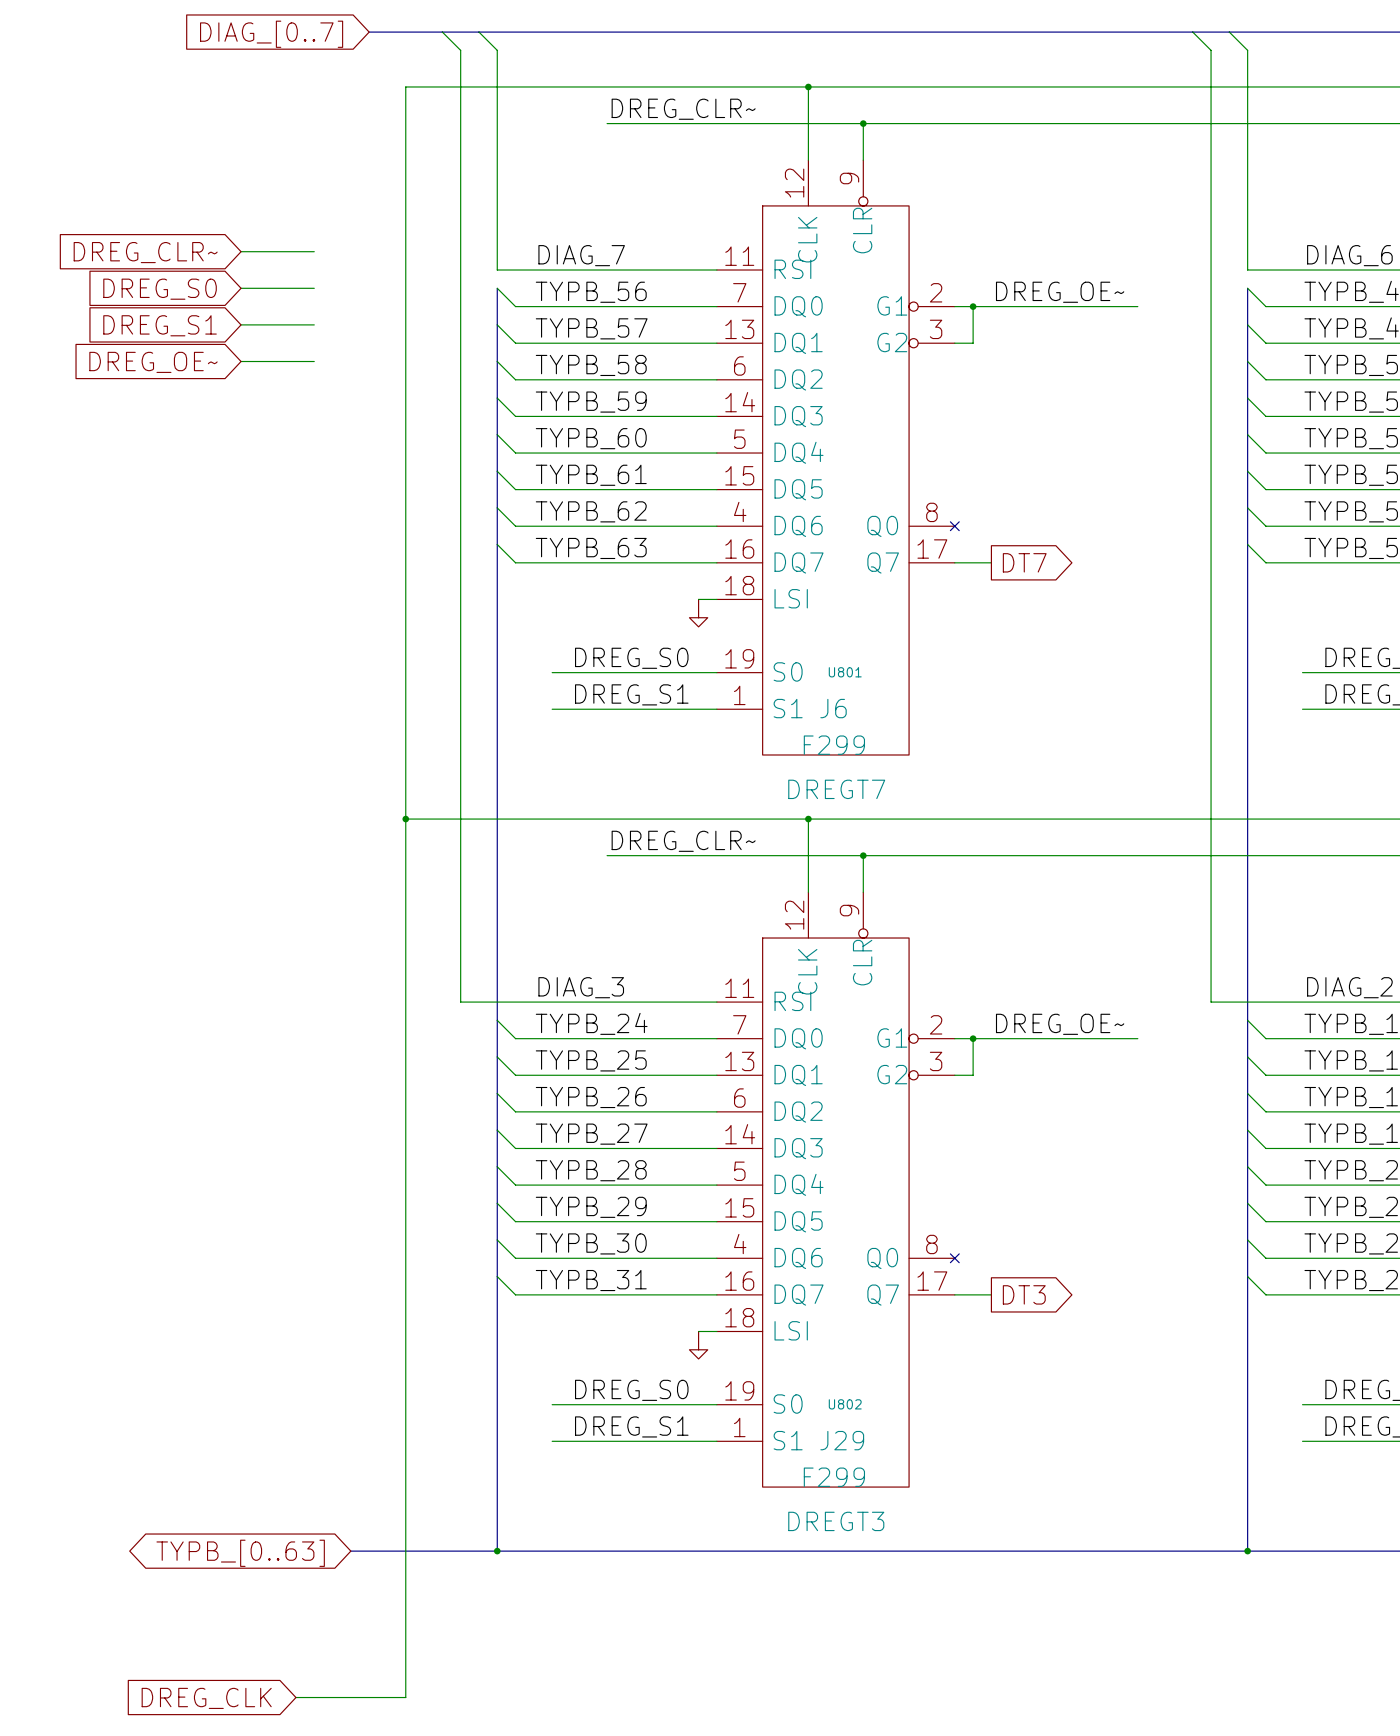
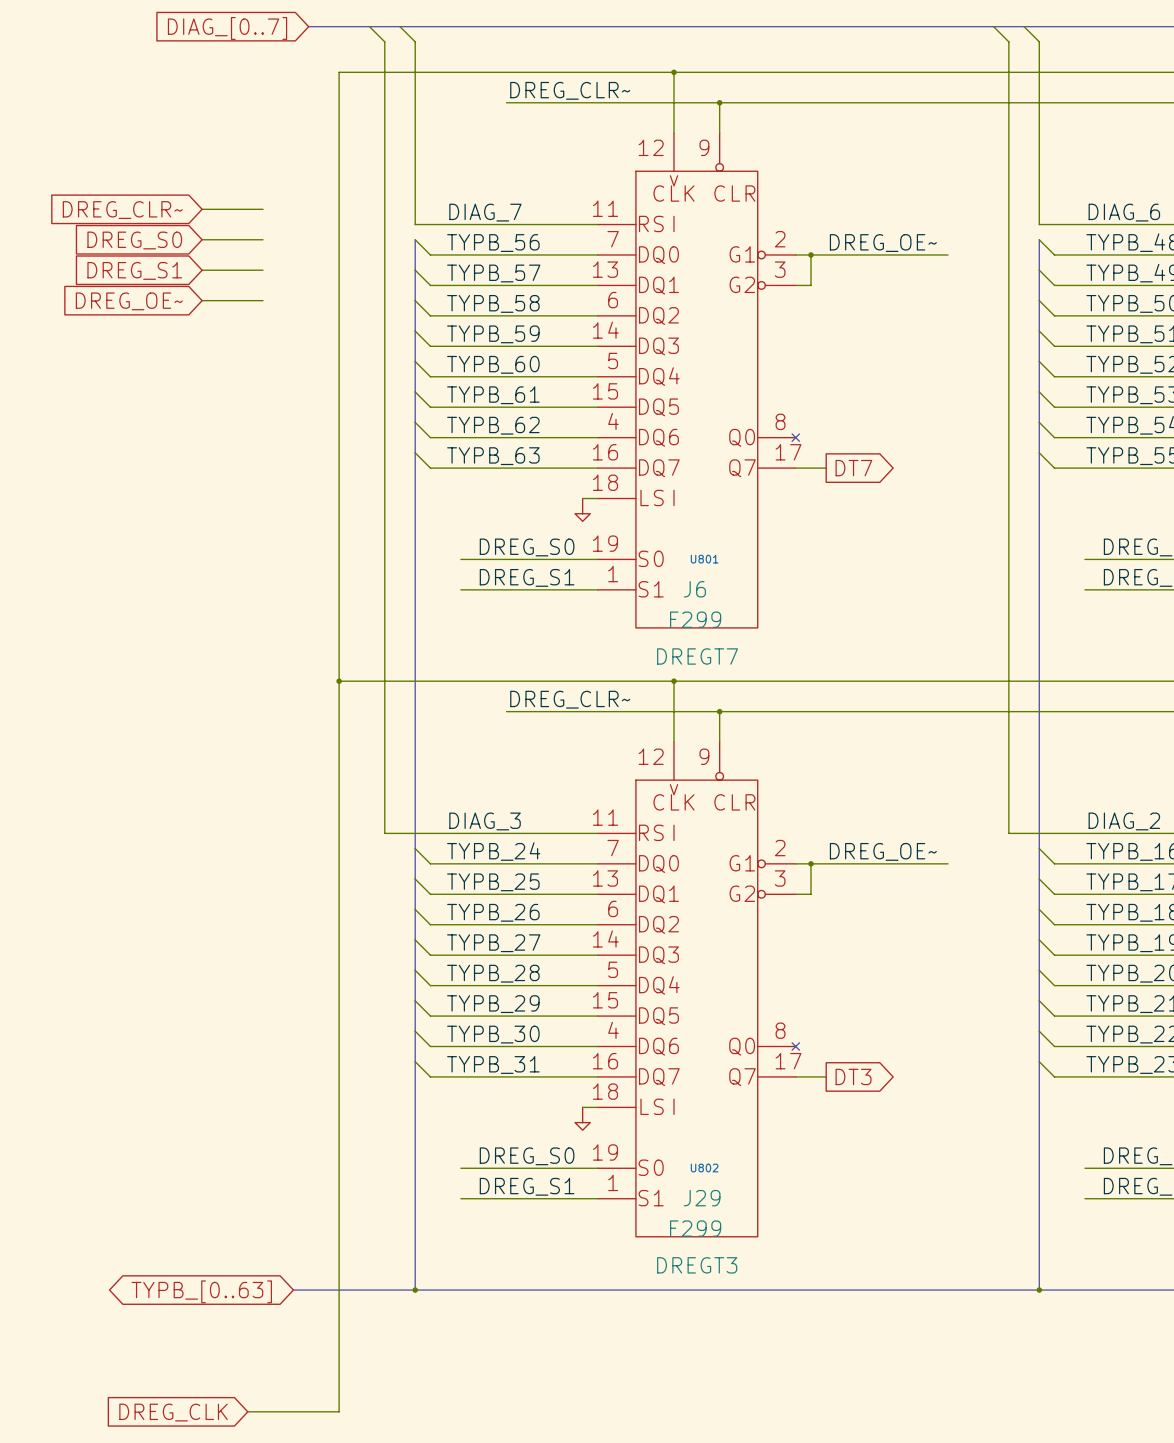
U801 symbol: [716, 160, 955, 755] -> [597, 133, 796, 628]
U802 symbol: [716, 892, 955, 1488] -> [597, 742, 796, 1237]

